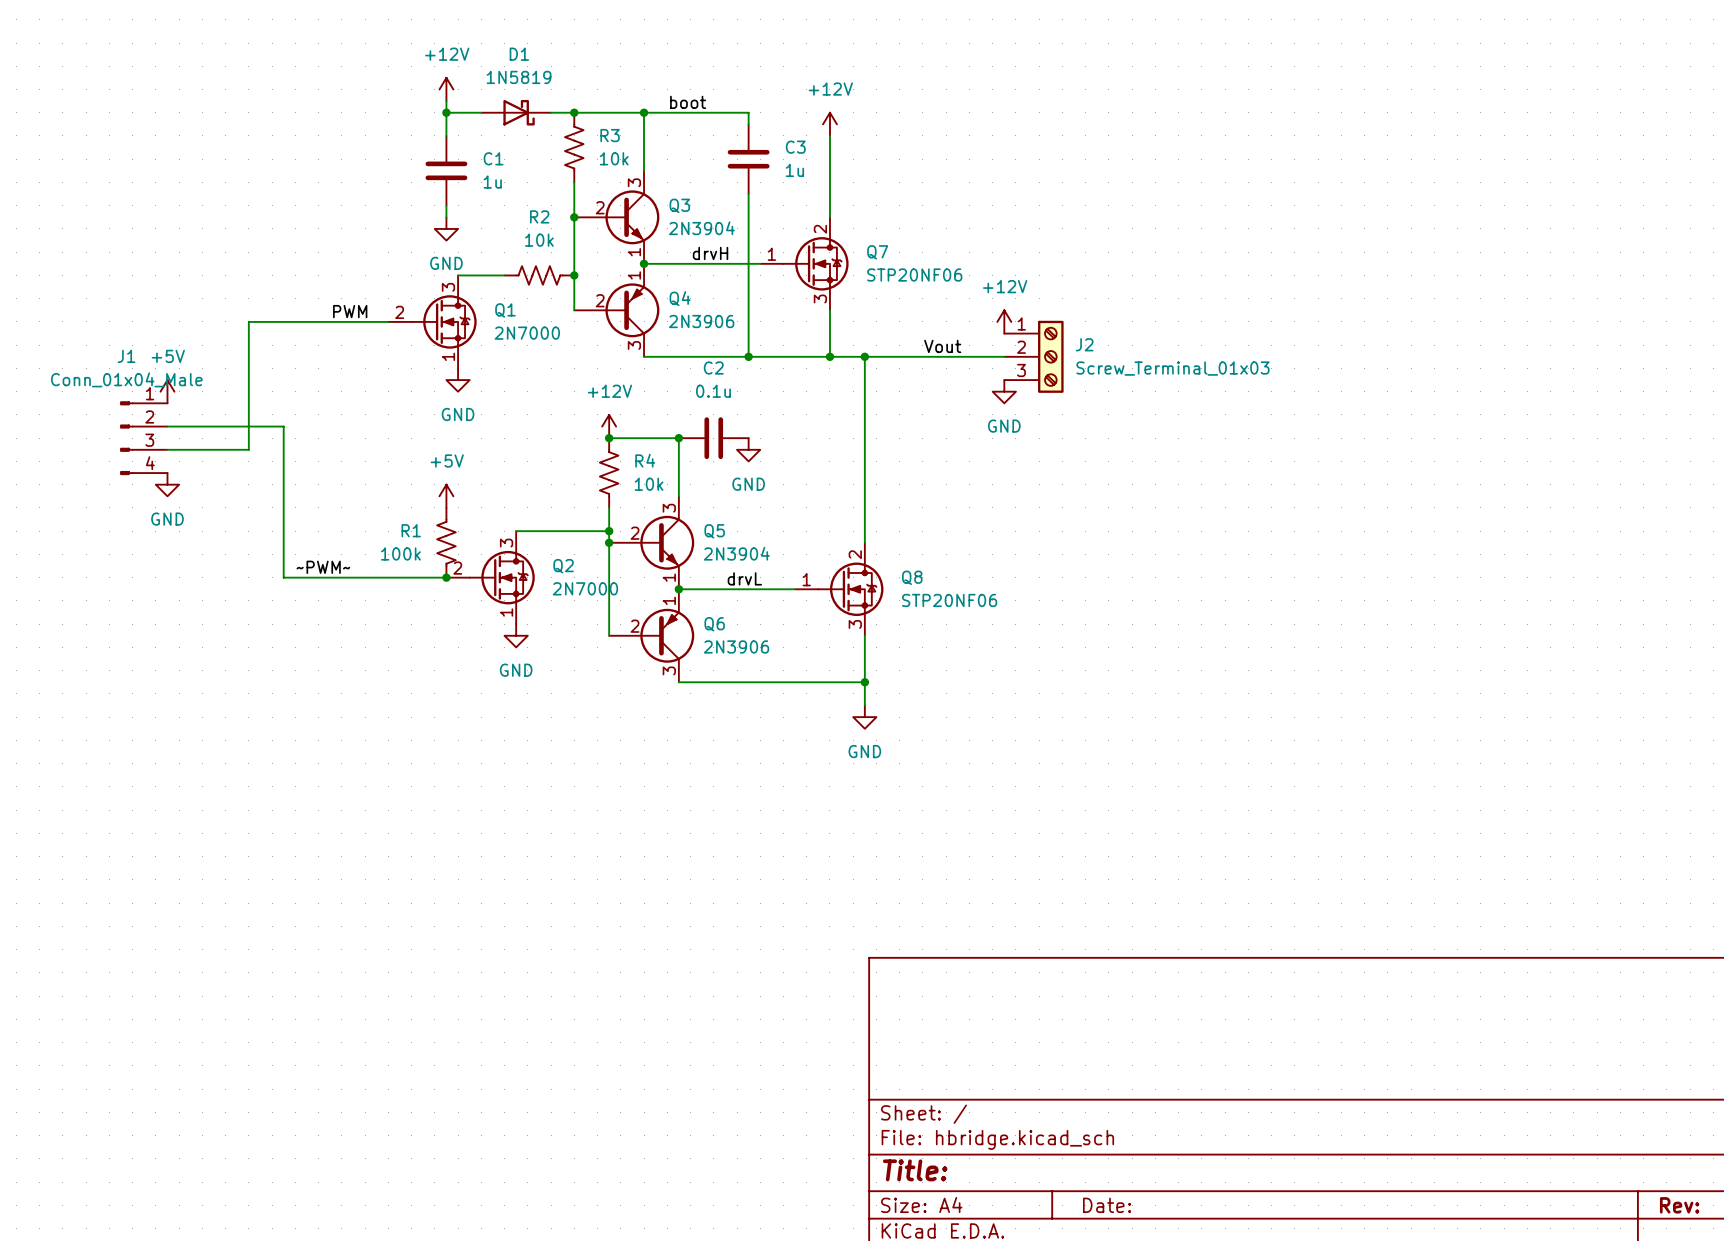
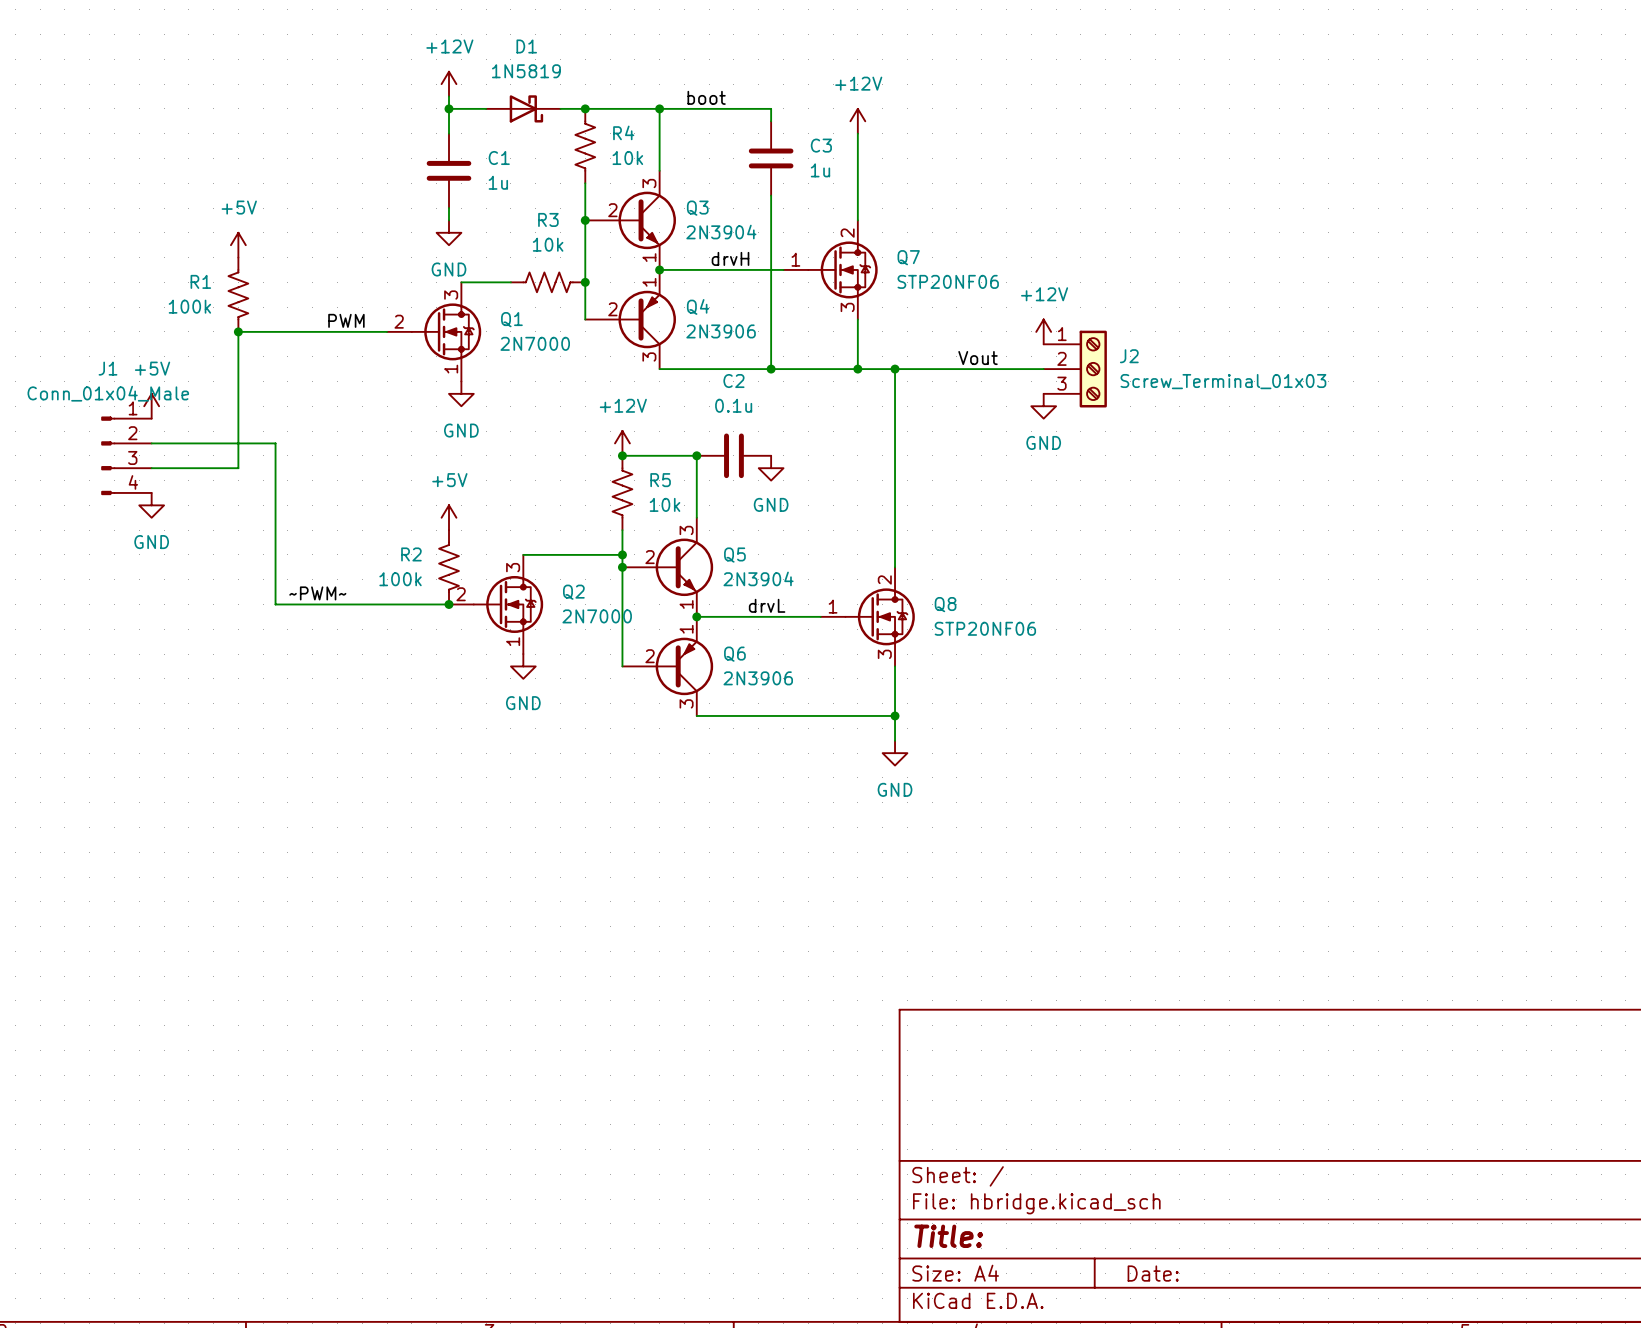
R3 name: R3 (610, 135) -> R4 (623, 132)
R2 name: R2 (539, 216) -> R3 (548, 219)
power symbol: none -> +5V (238, 245)
R1: none -> 100k (238, 294)
junction: none -> (238, 331)
R4 name: R4 (645, 460) -> R5 (660, 480)
R1 name: R1 (411, 530) -> R2 (411, 554)

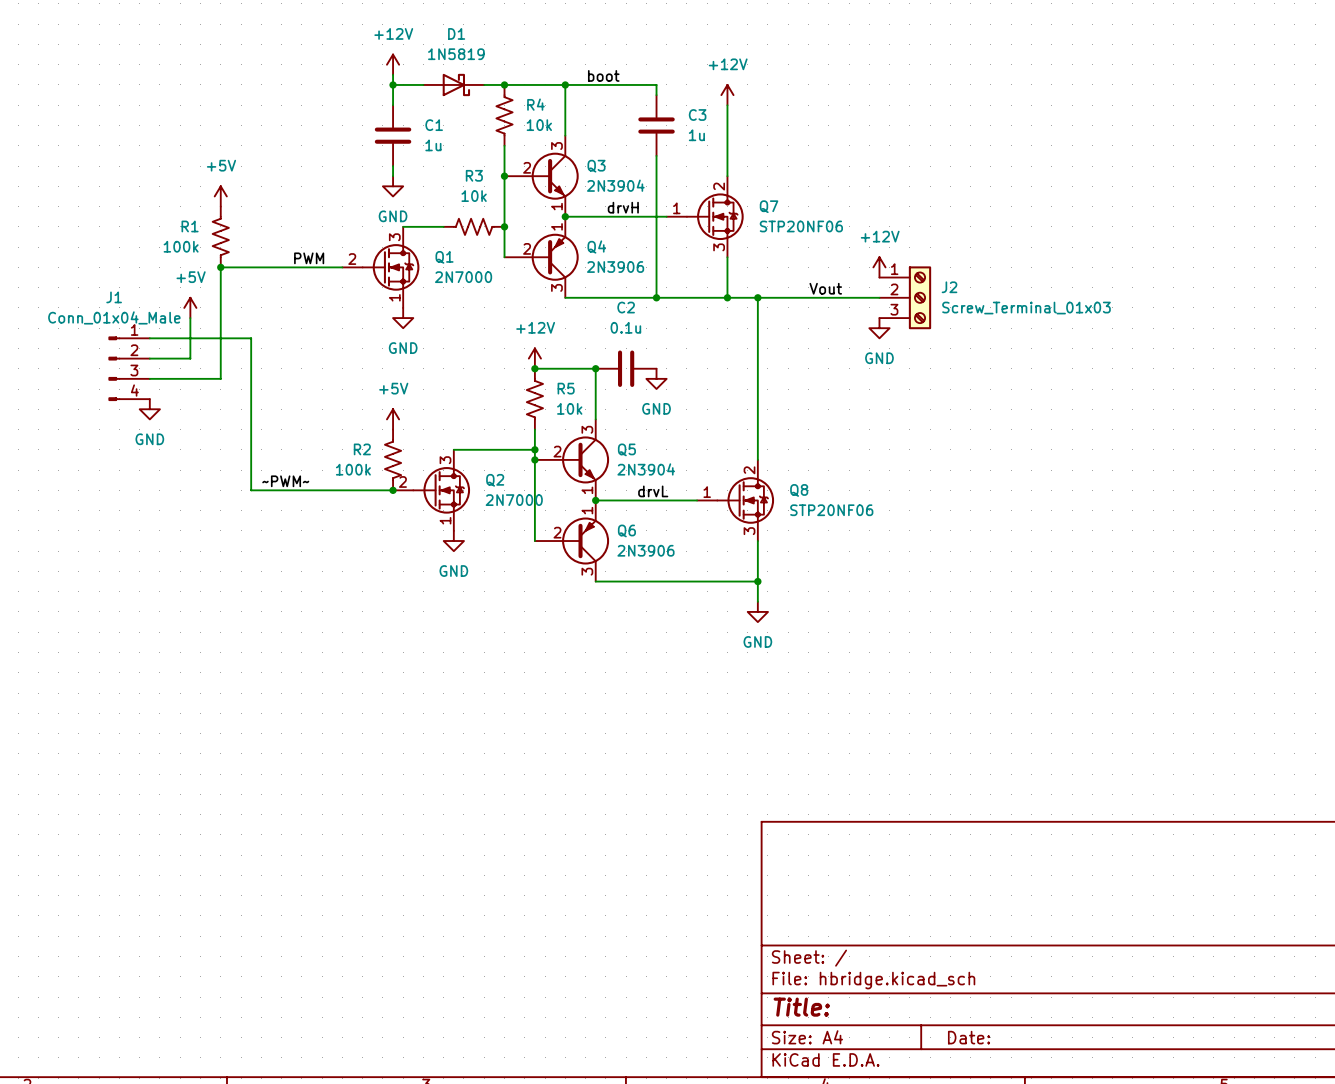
wire: none -> (190, 318) (190, 358)
power symbol position: +5V (151, 406) -> +5V (190, 307)
wire: (201, 443) (275, 443) -> (149, 338) (251, 338) (251, 358)

